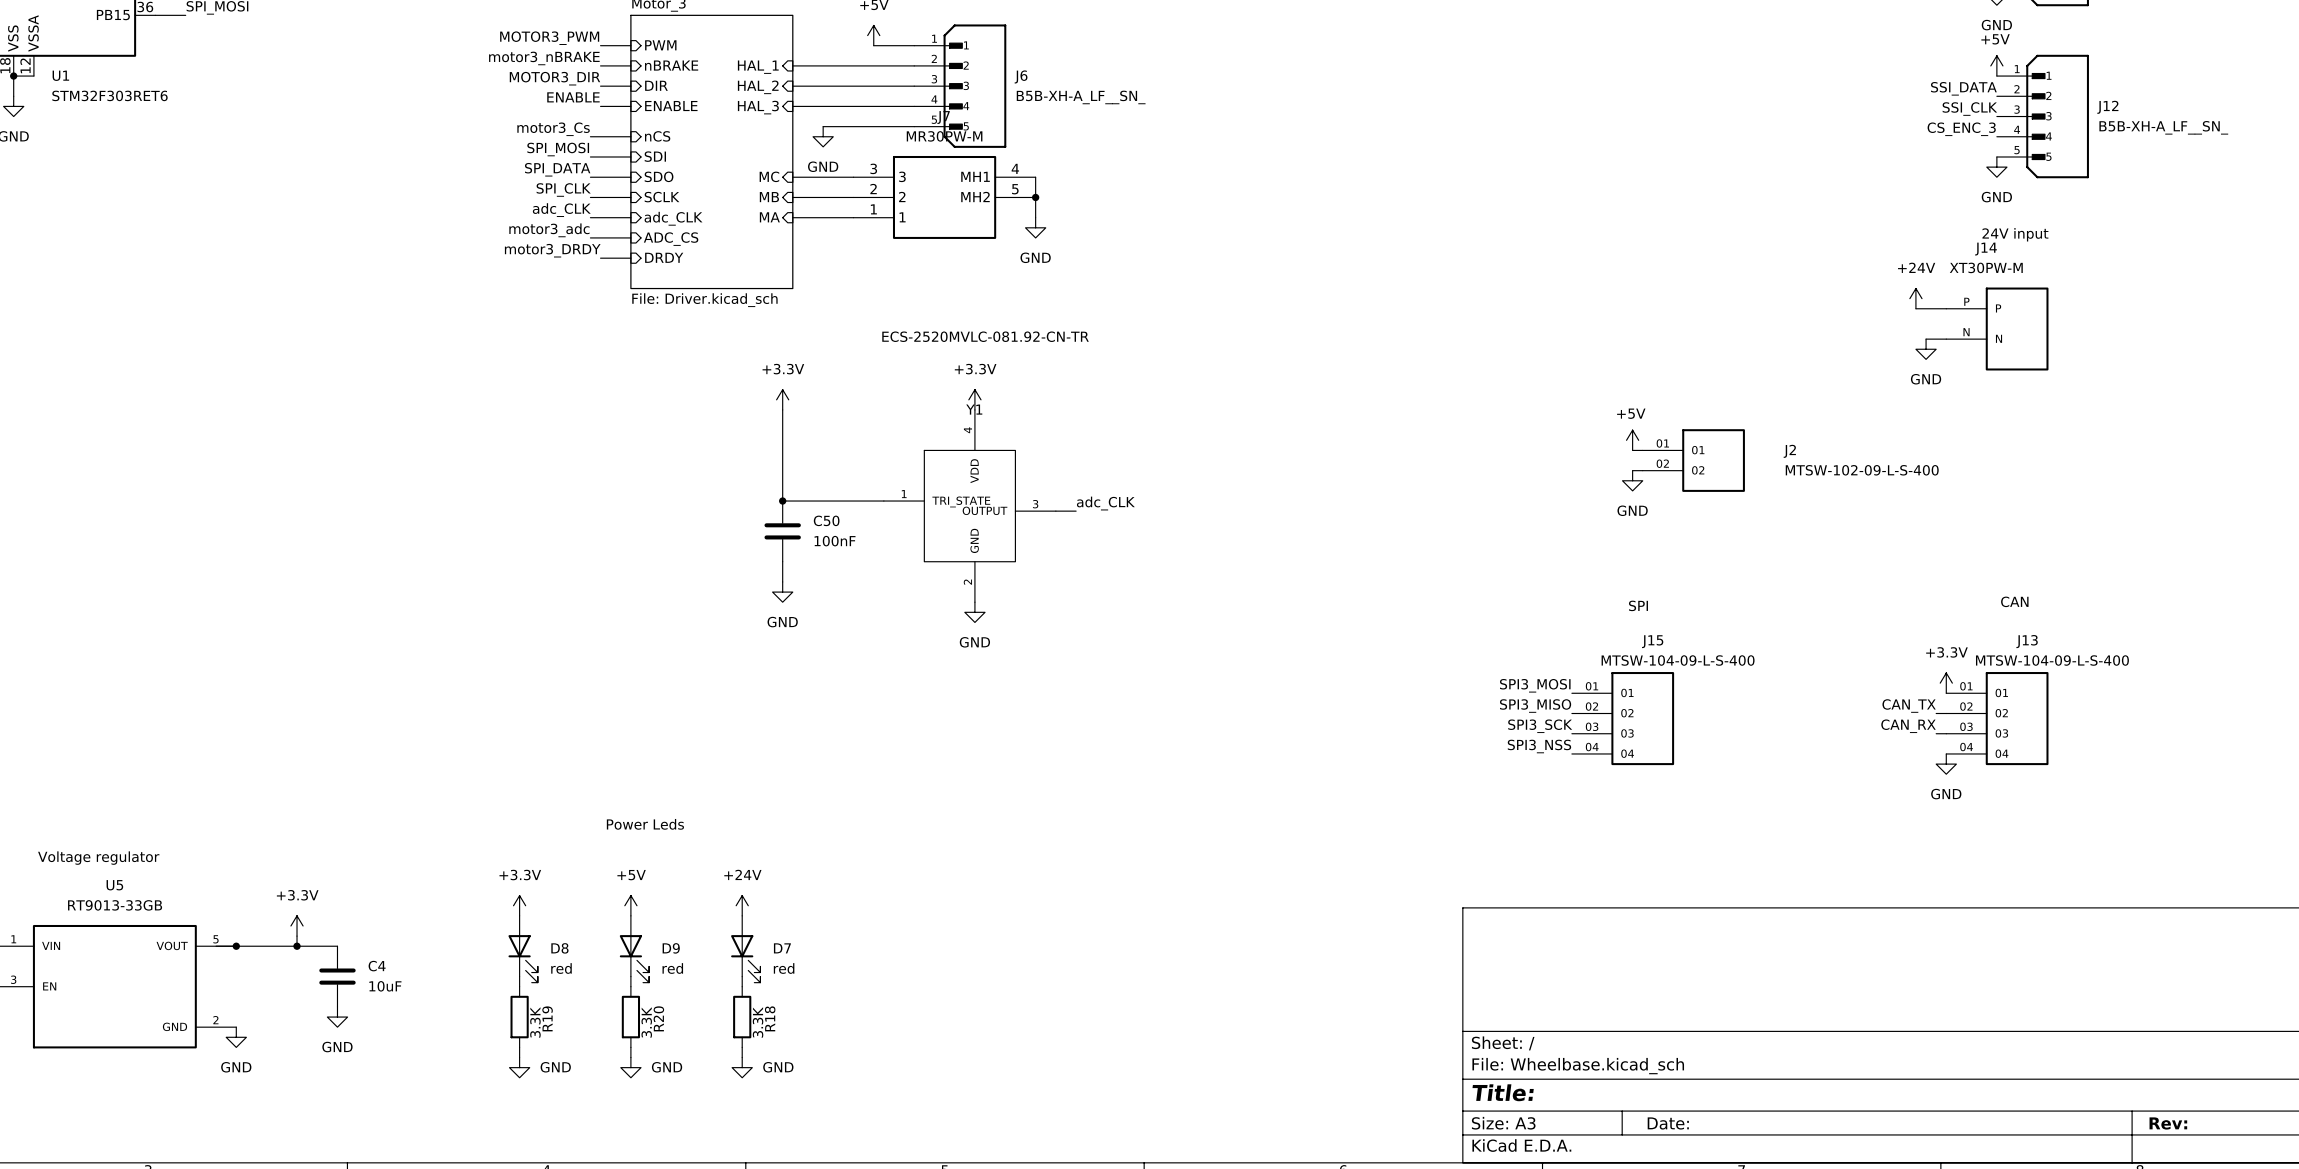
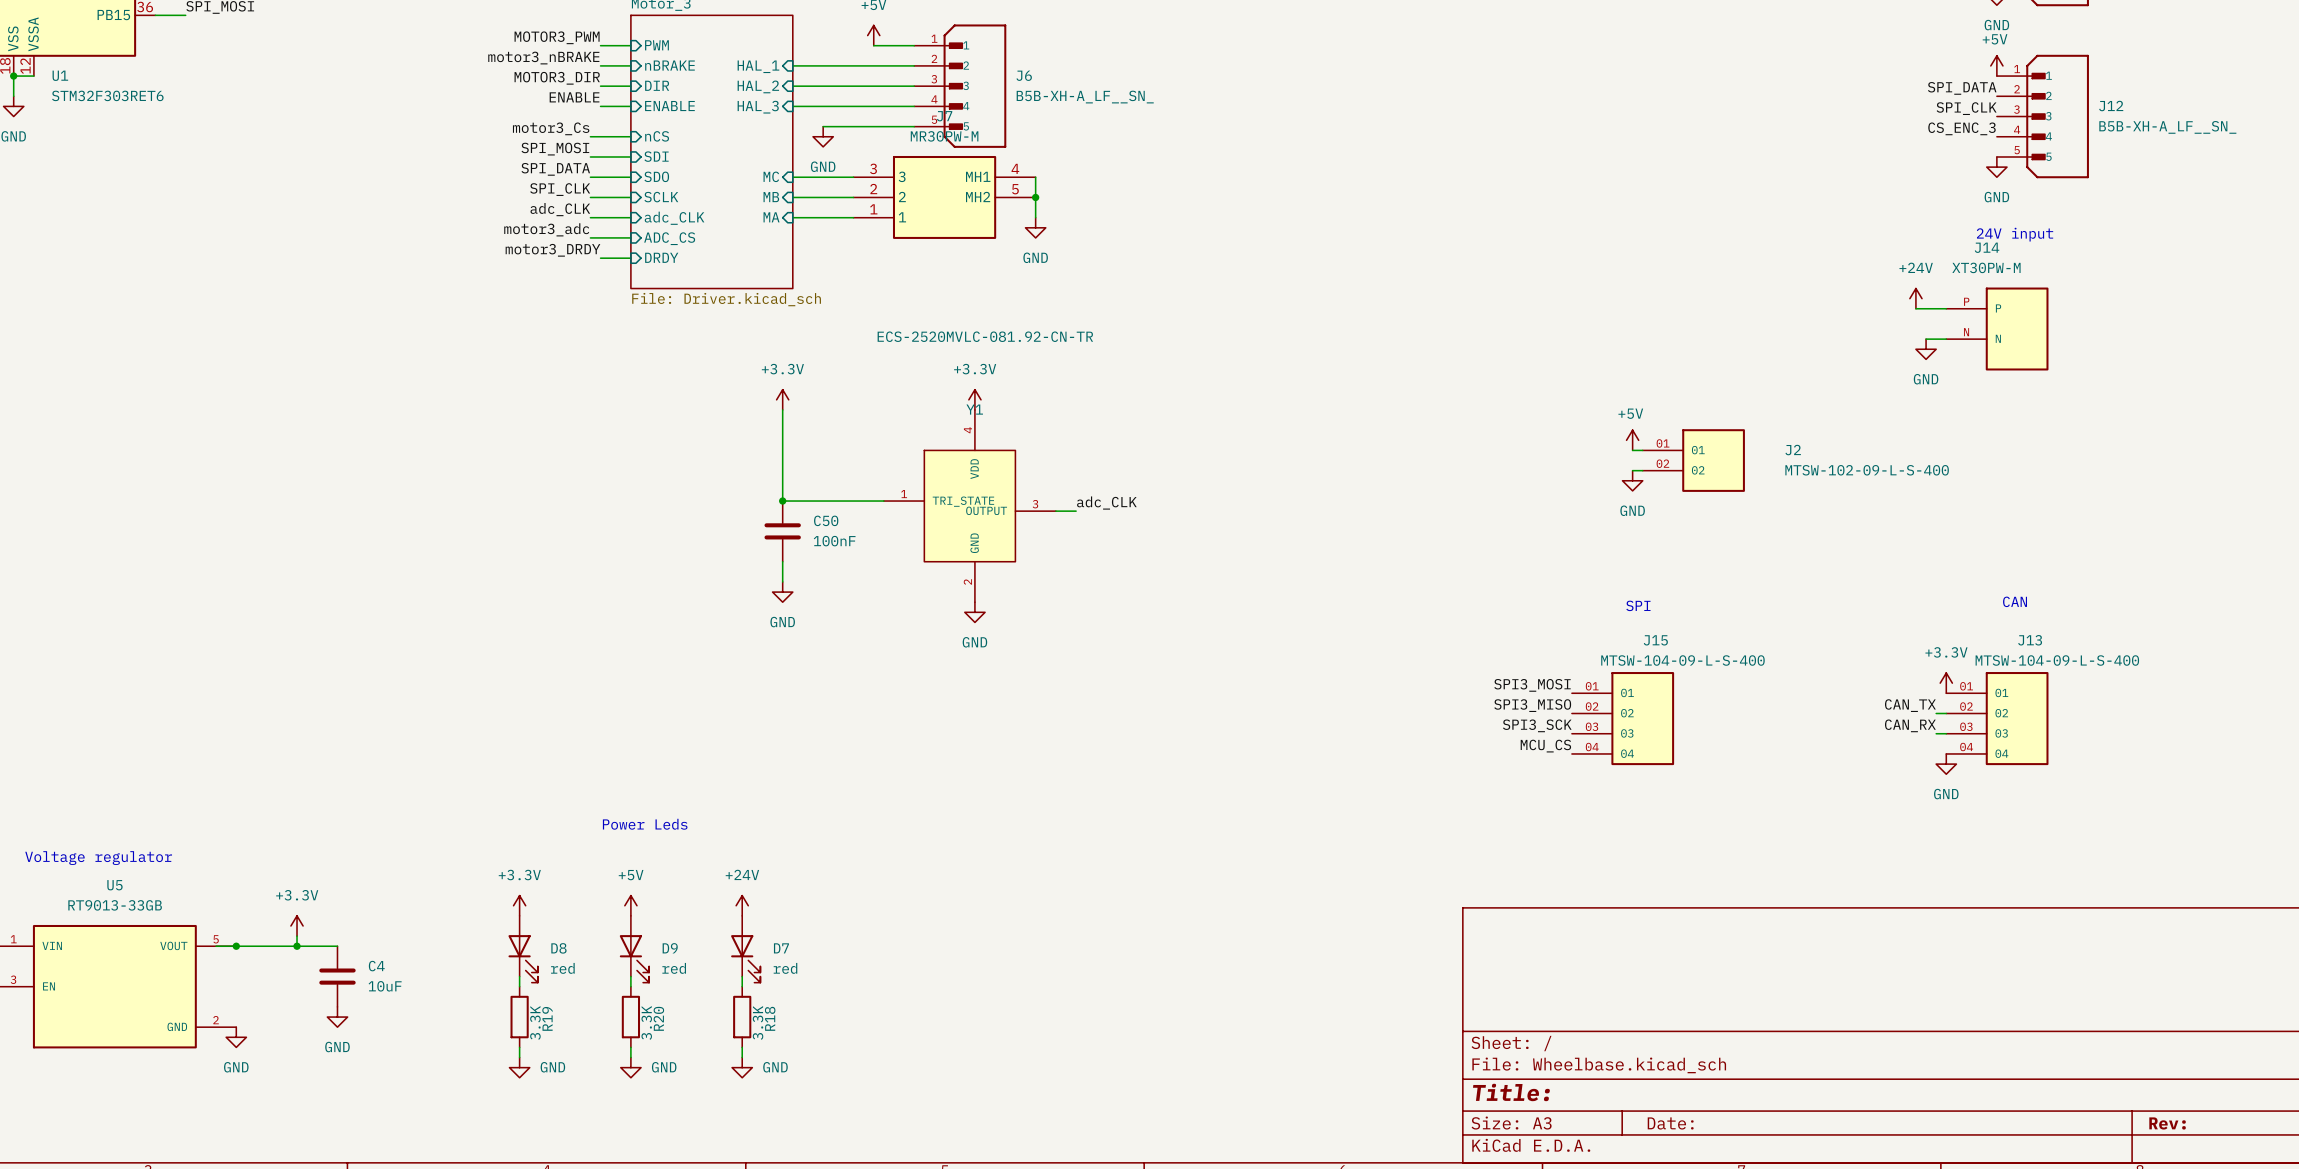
label: SSI_DATA (1963, 88) -> SPI_DATA (1962, 88)
label: SSI_CLK (1969, 109) -> SPI_CLK (1966, 108)
label: SPI3_NSS (1539, 746) -> MCU_CS (1545, 746)

